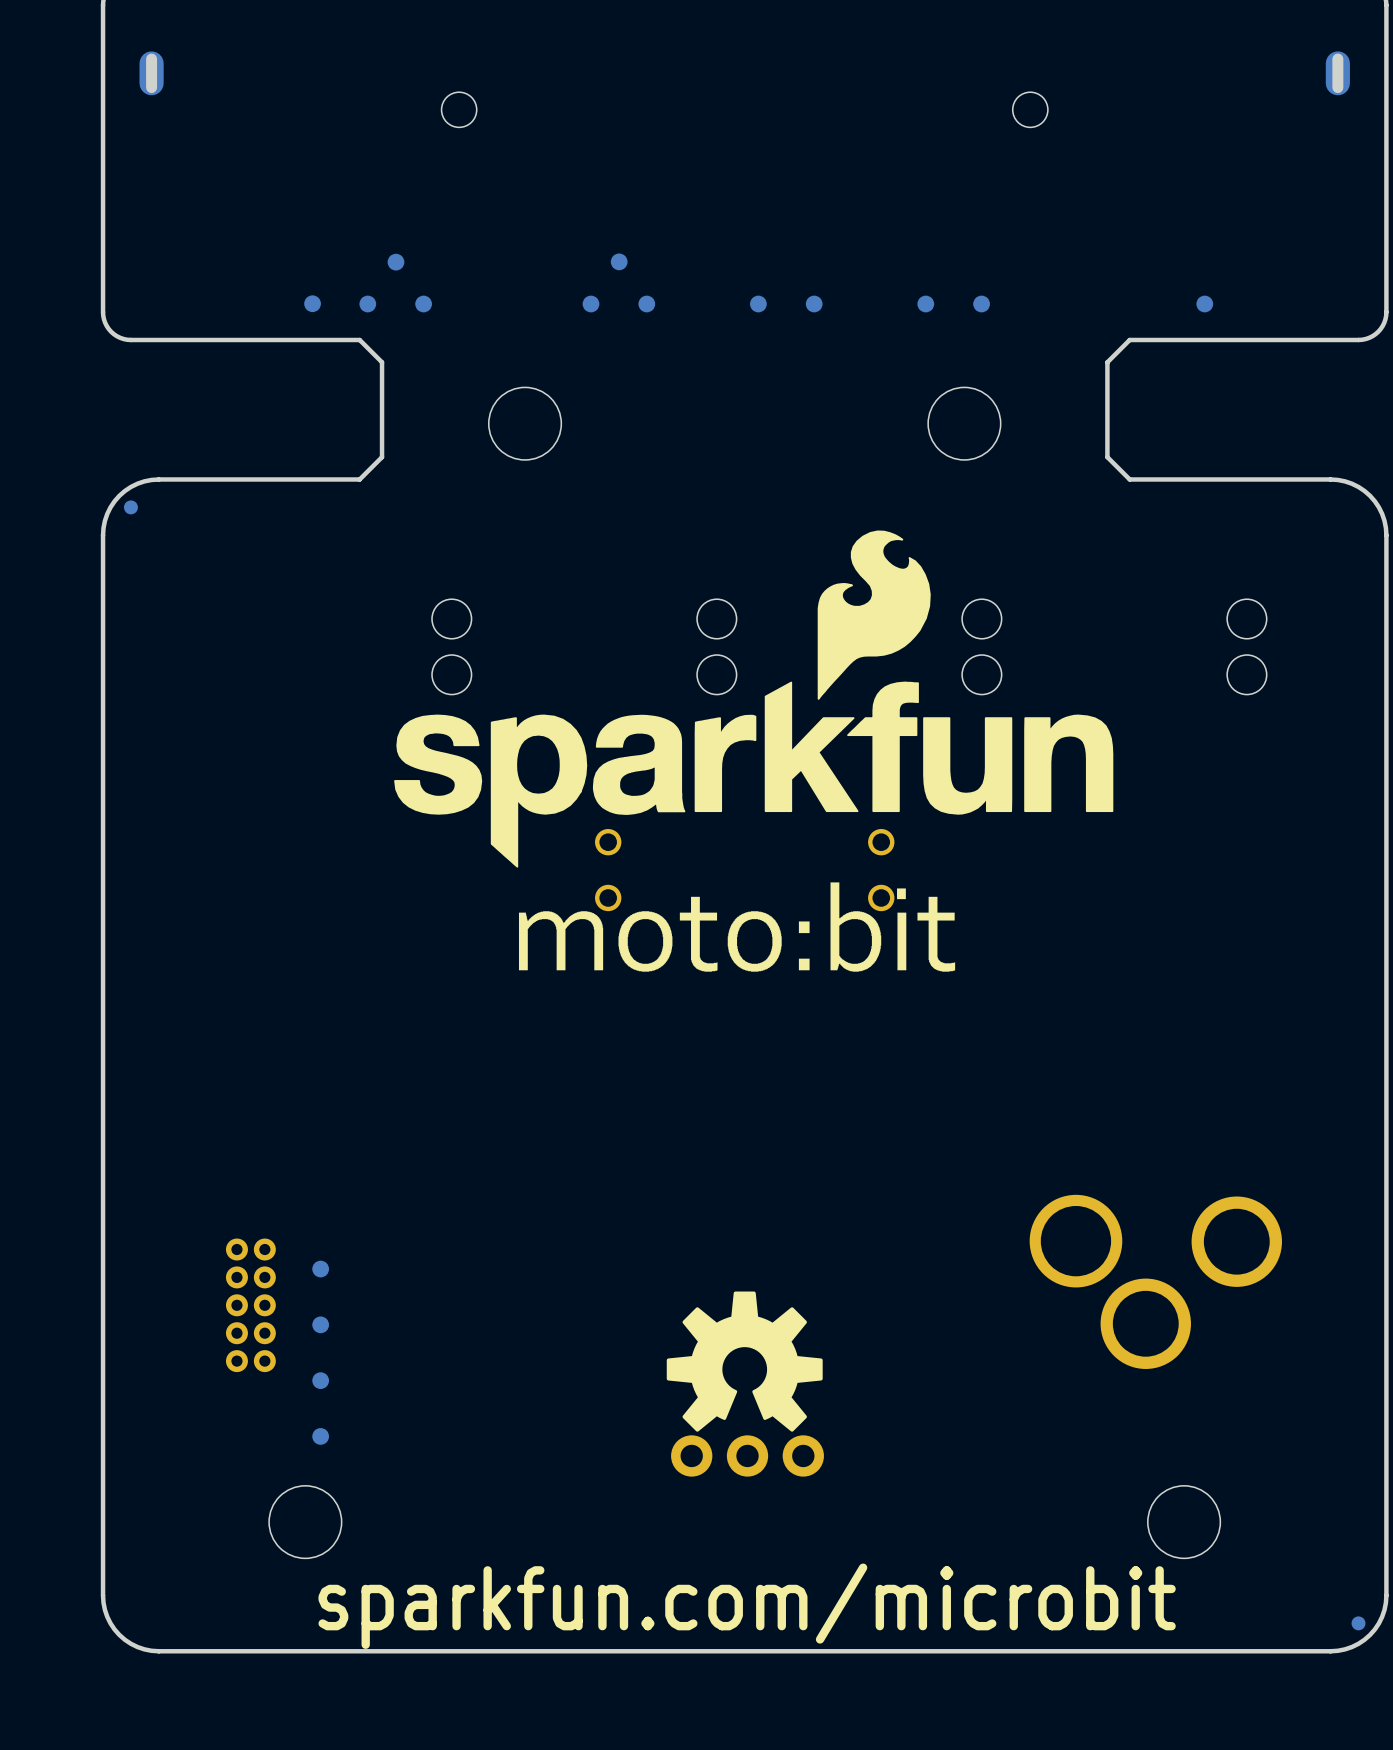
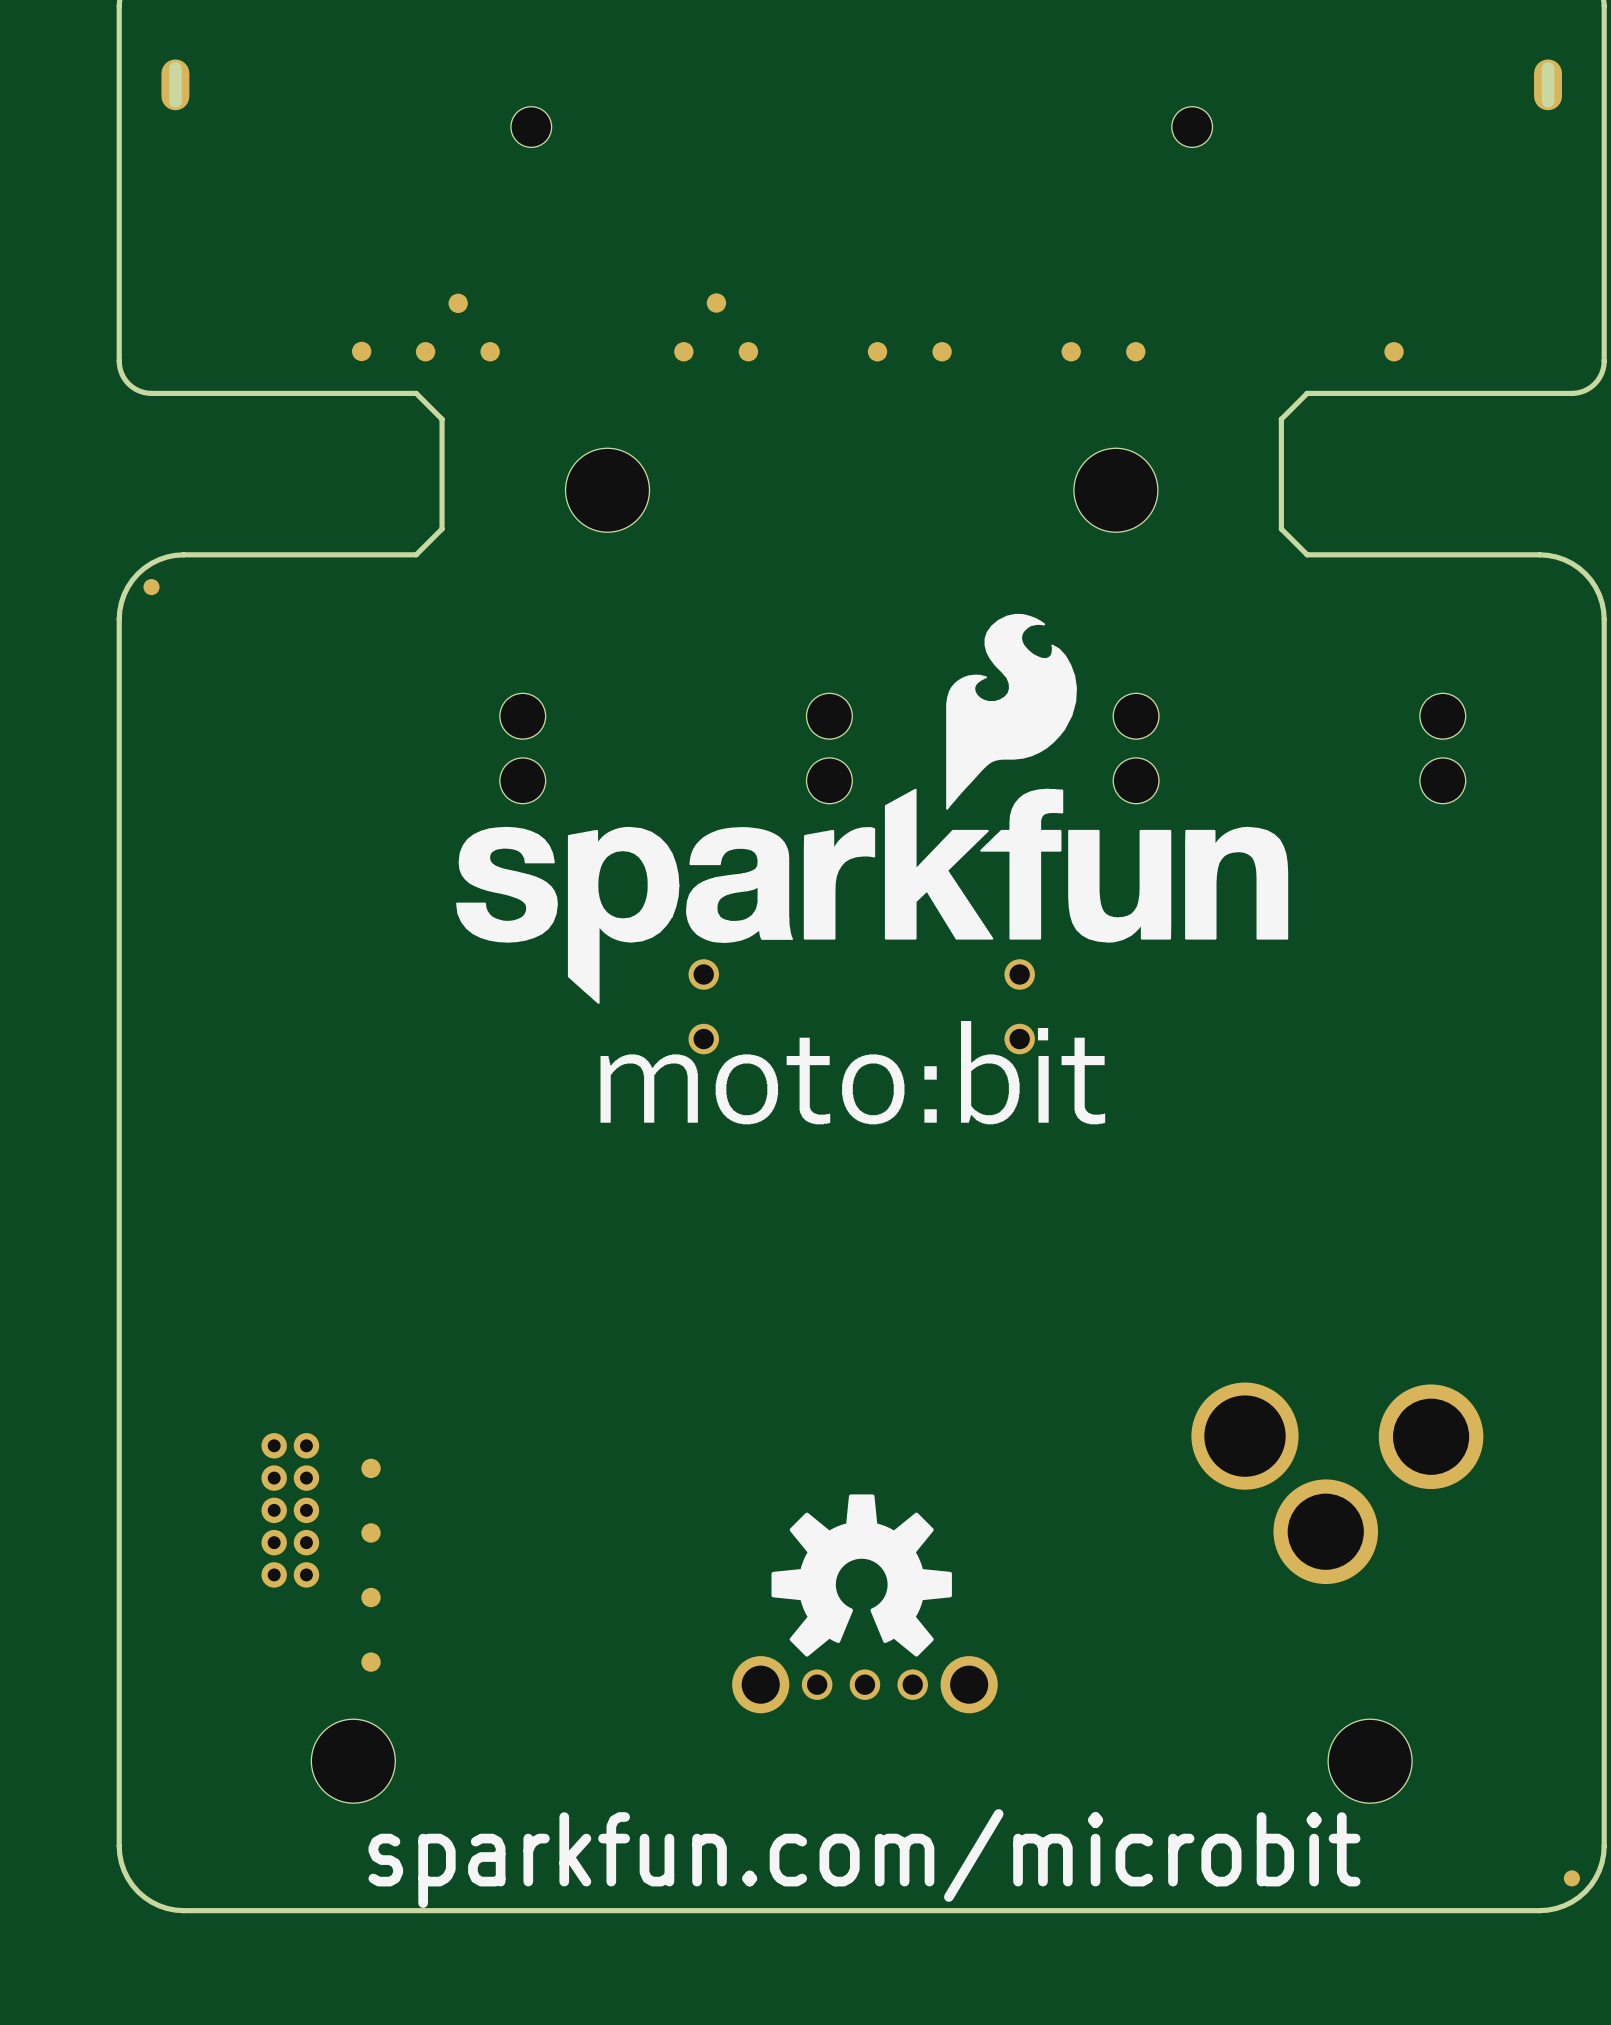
part footprint: [671, 1435, 824, 1477] -> [732, 1656, 998, 1714]

